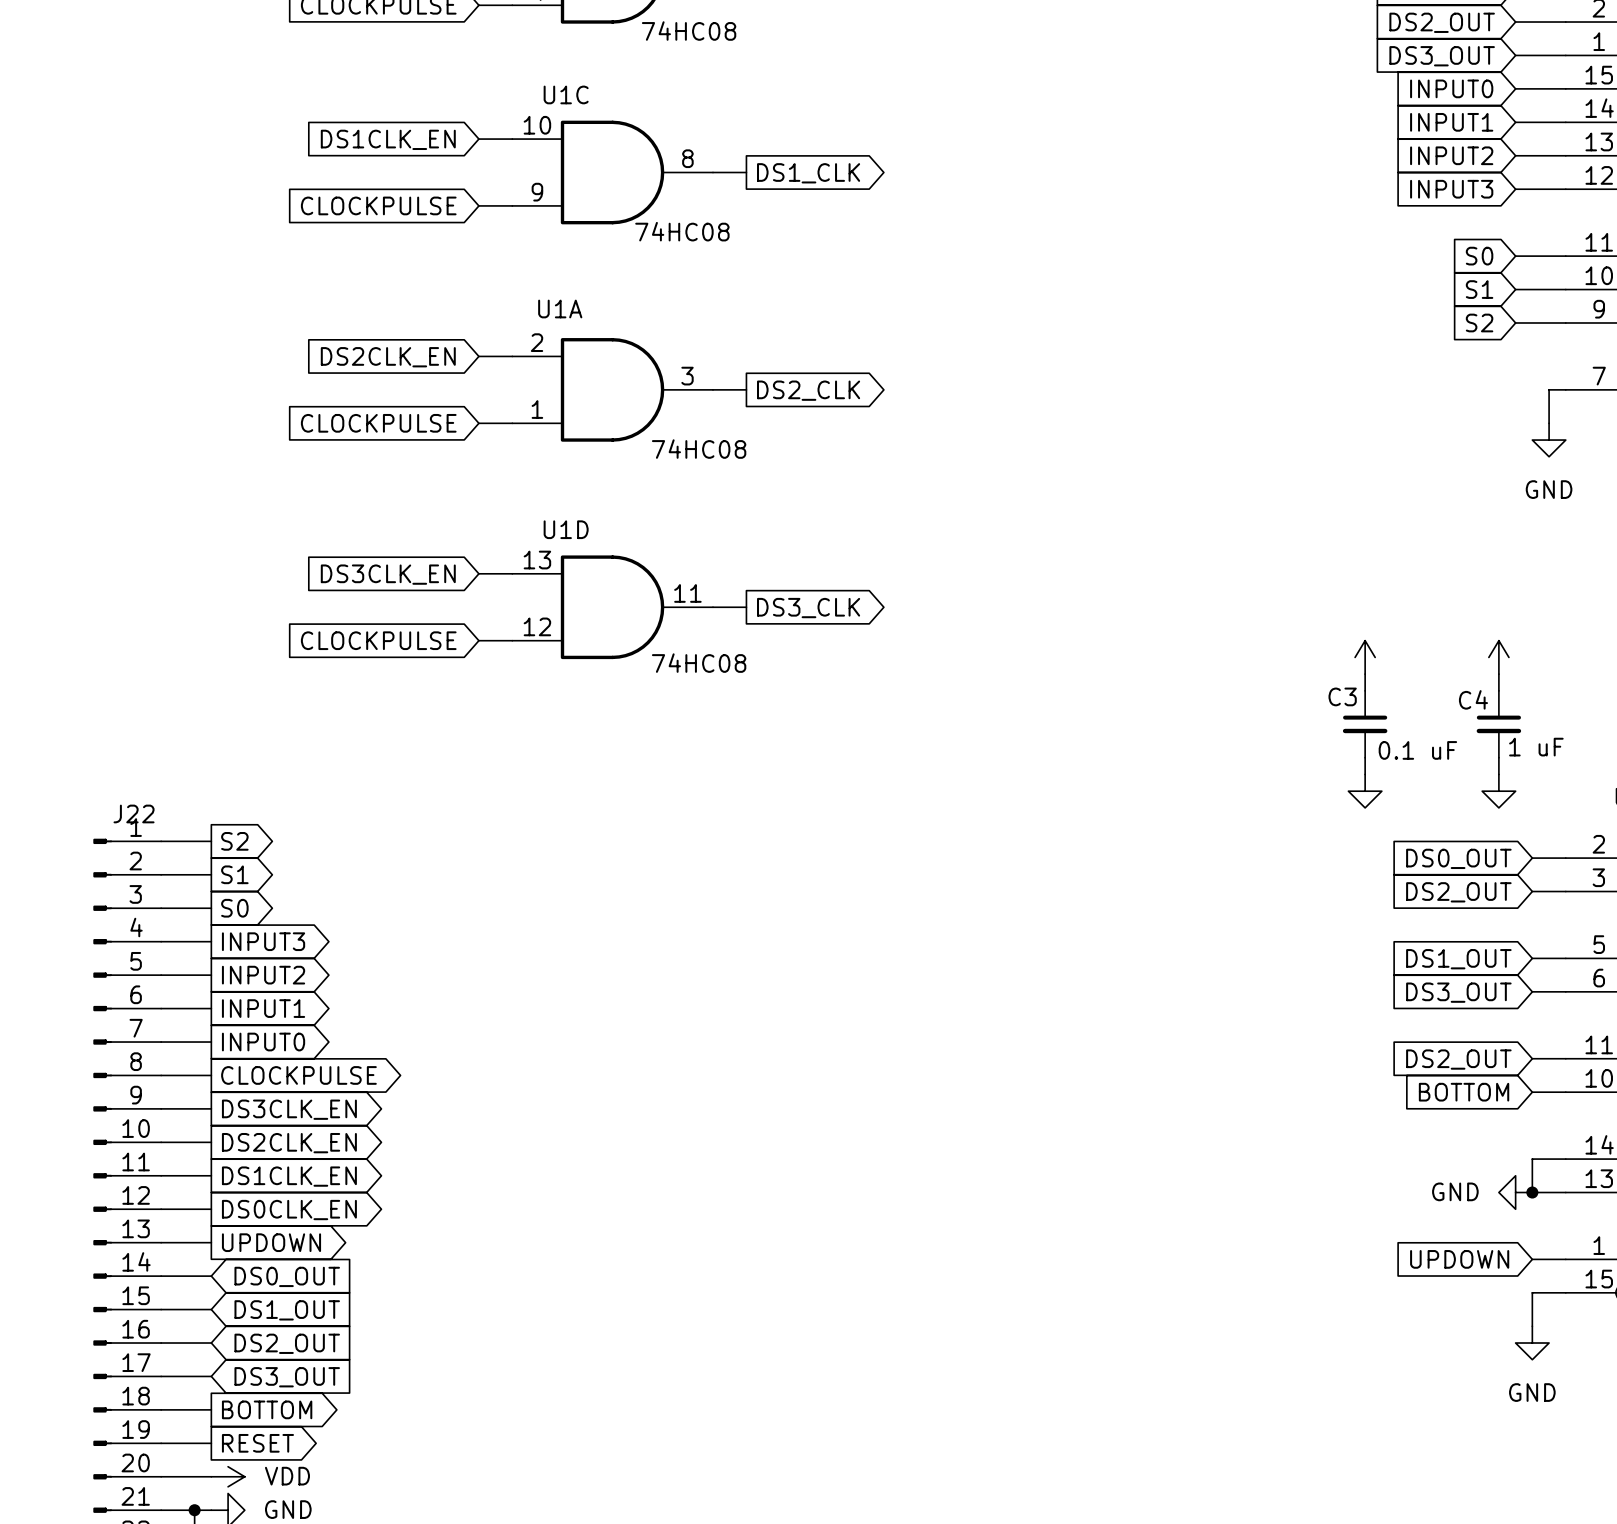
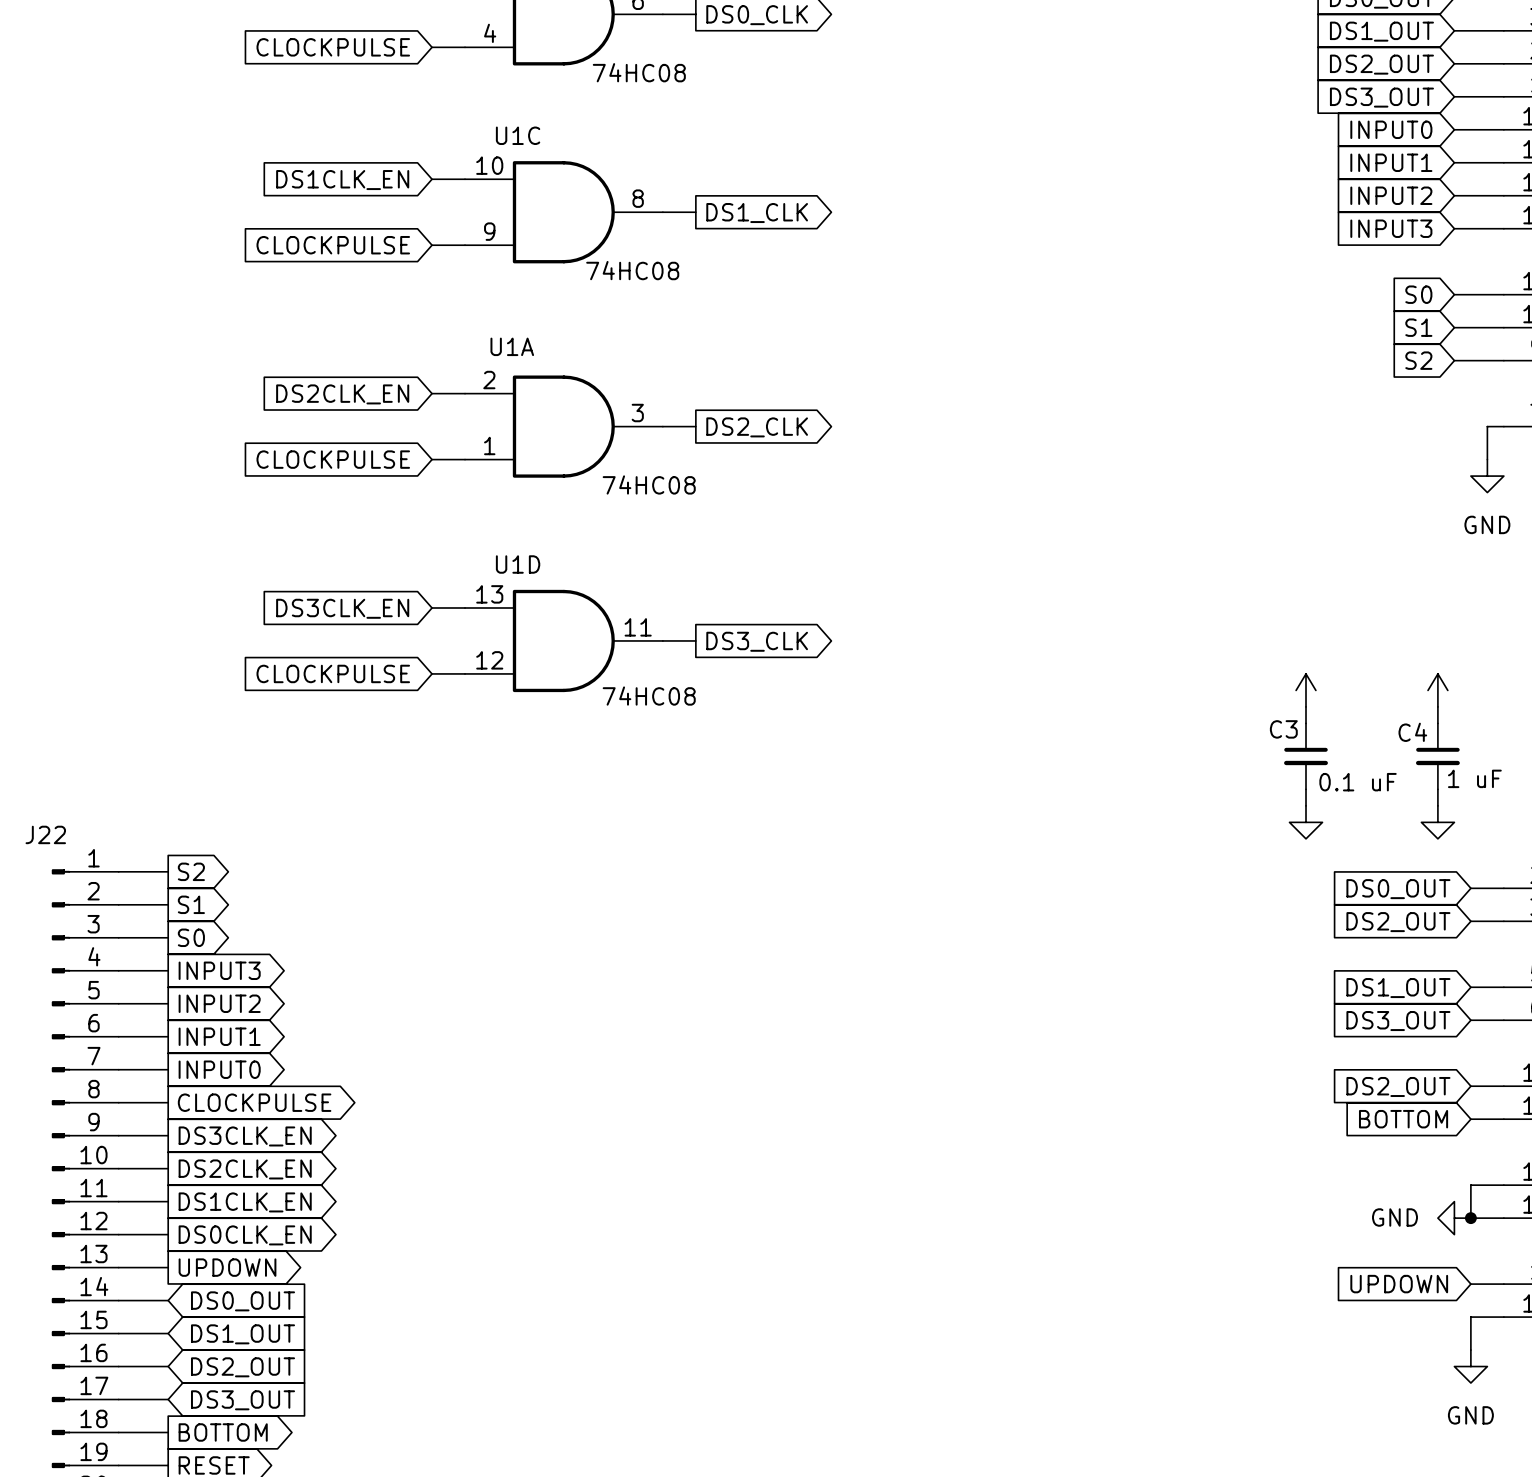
J22 name position: J22 (134, 813) -> J22 (45, 834)

